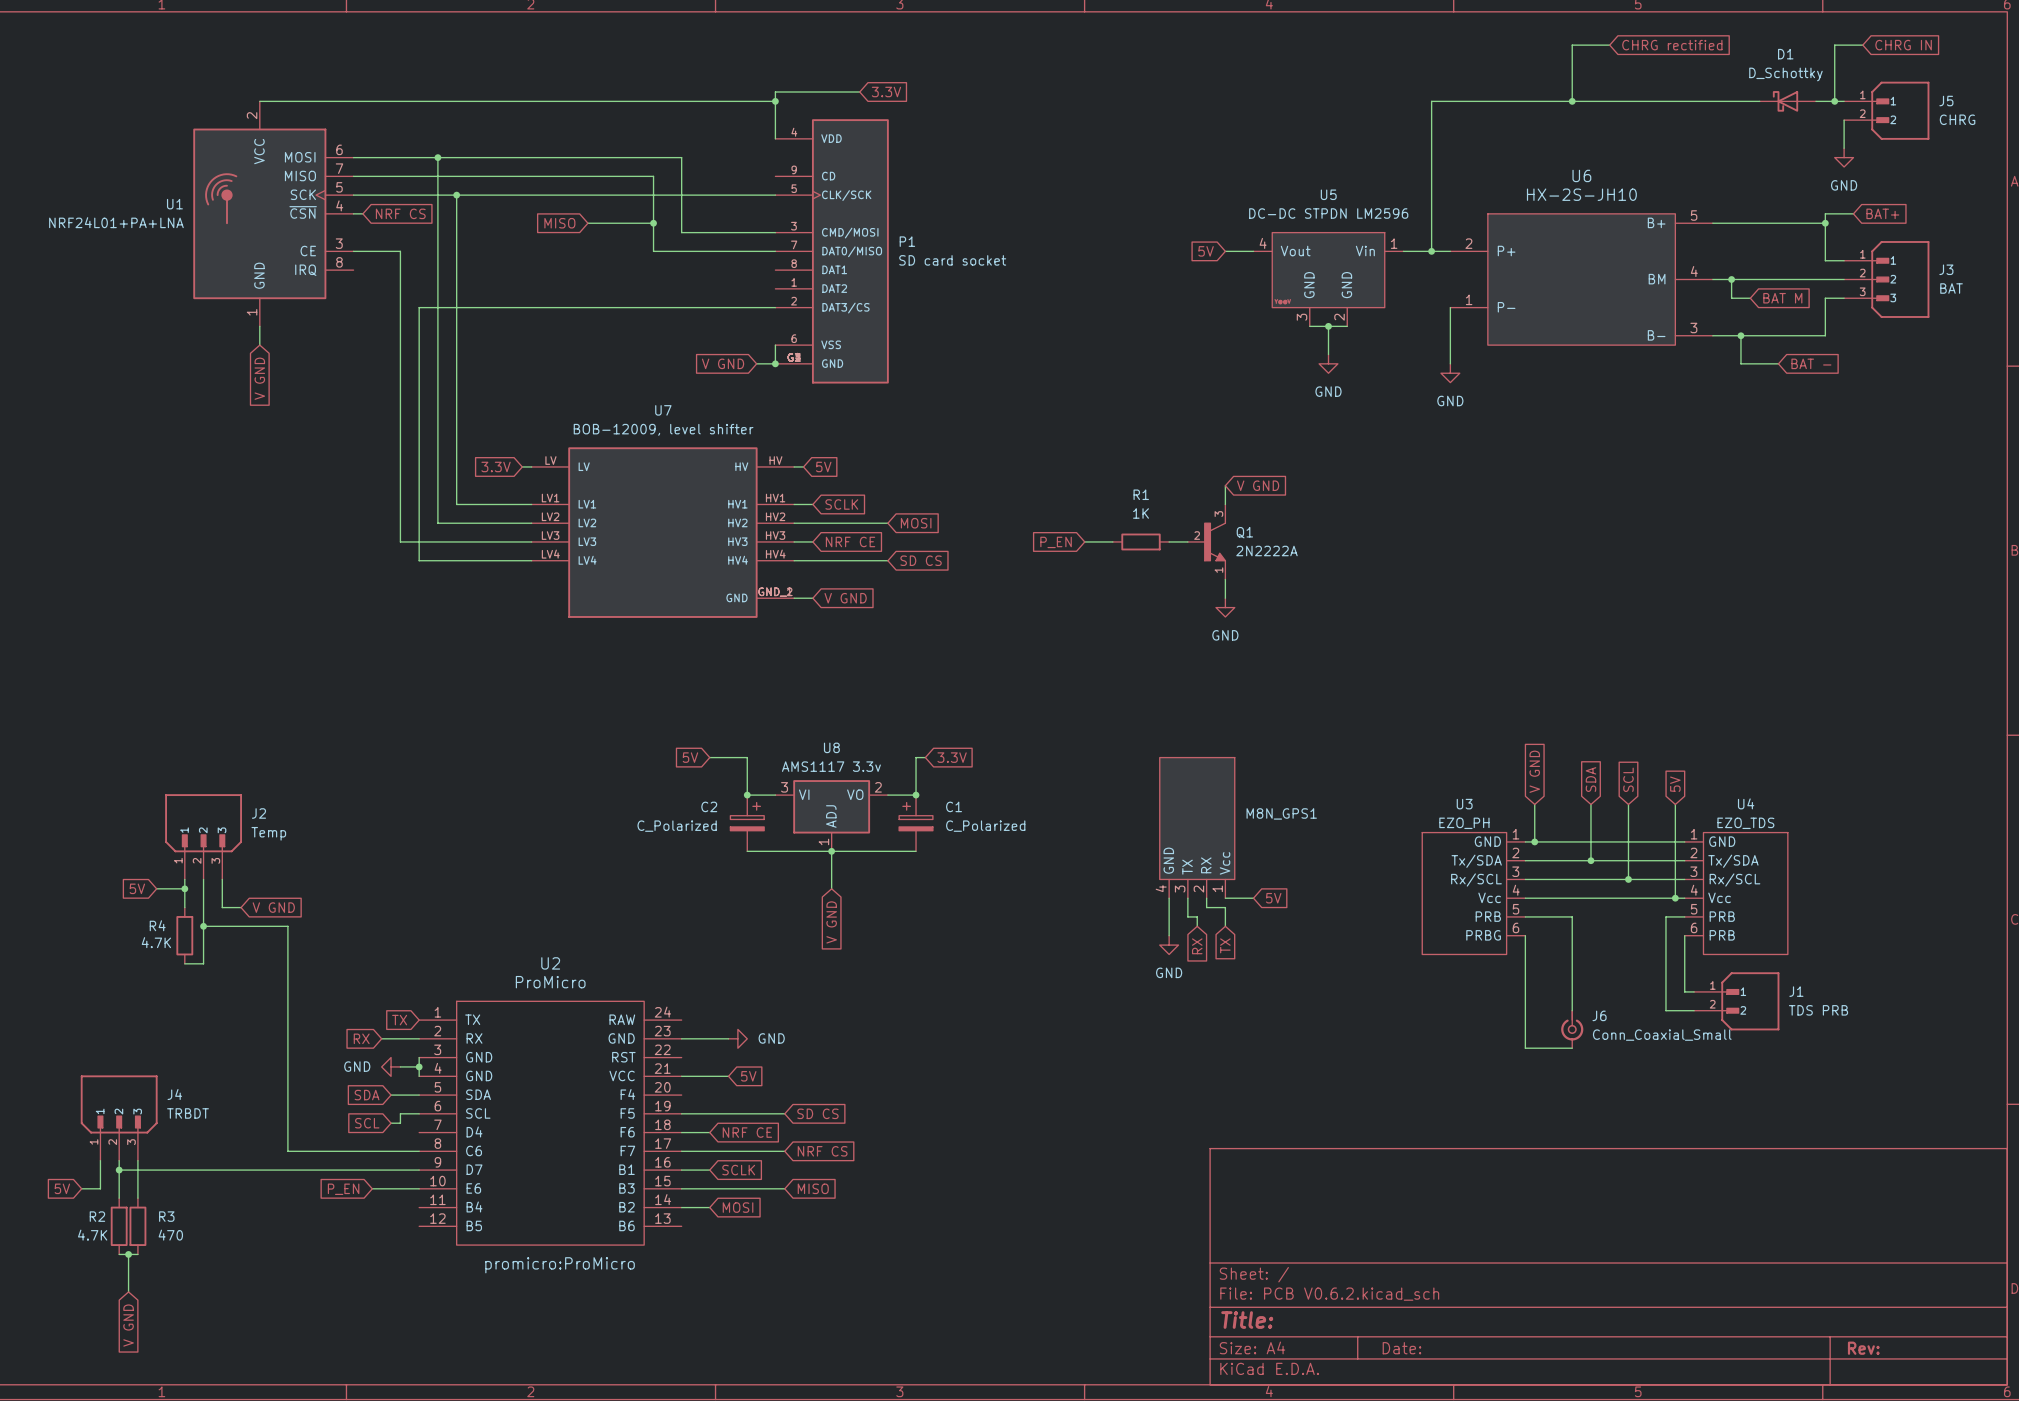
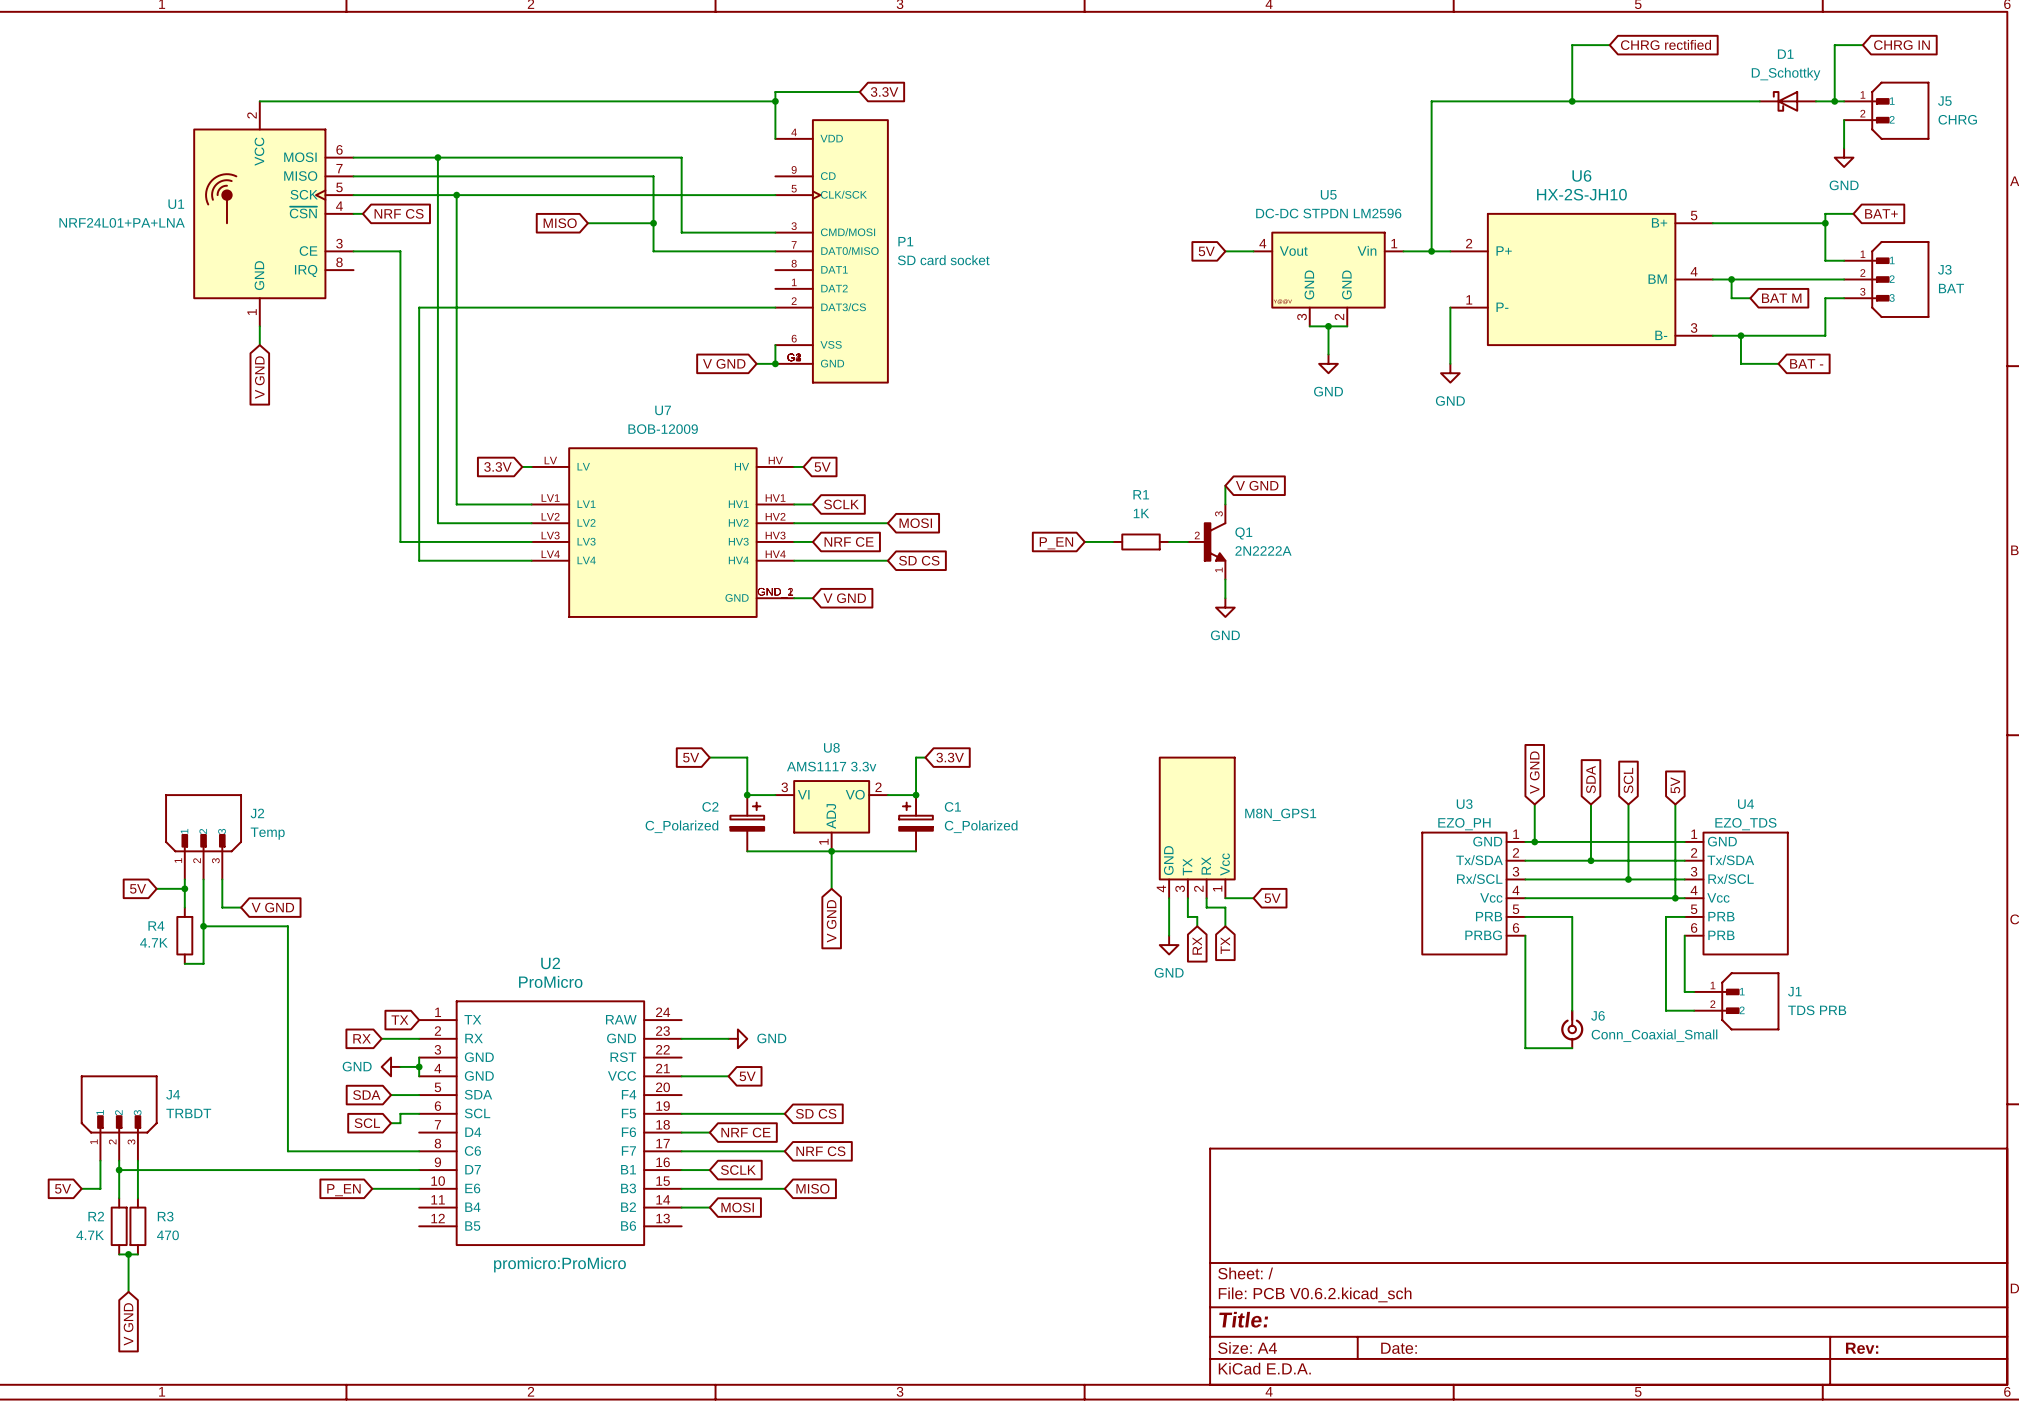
U7 value: BOB-12009, level shifter (663, 429) -> BOB-12009 (663, 429)

